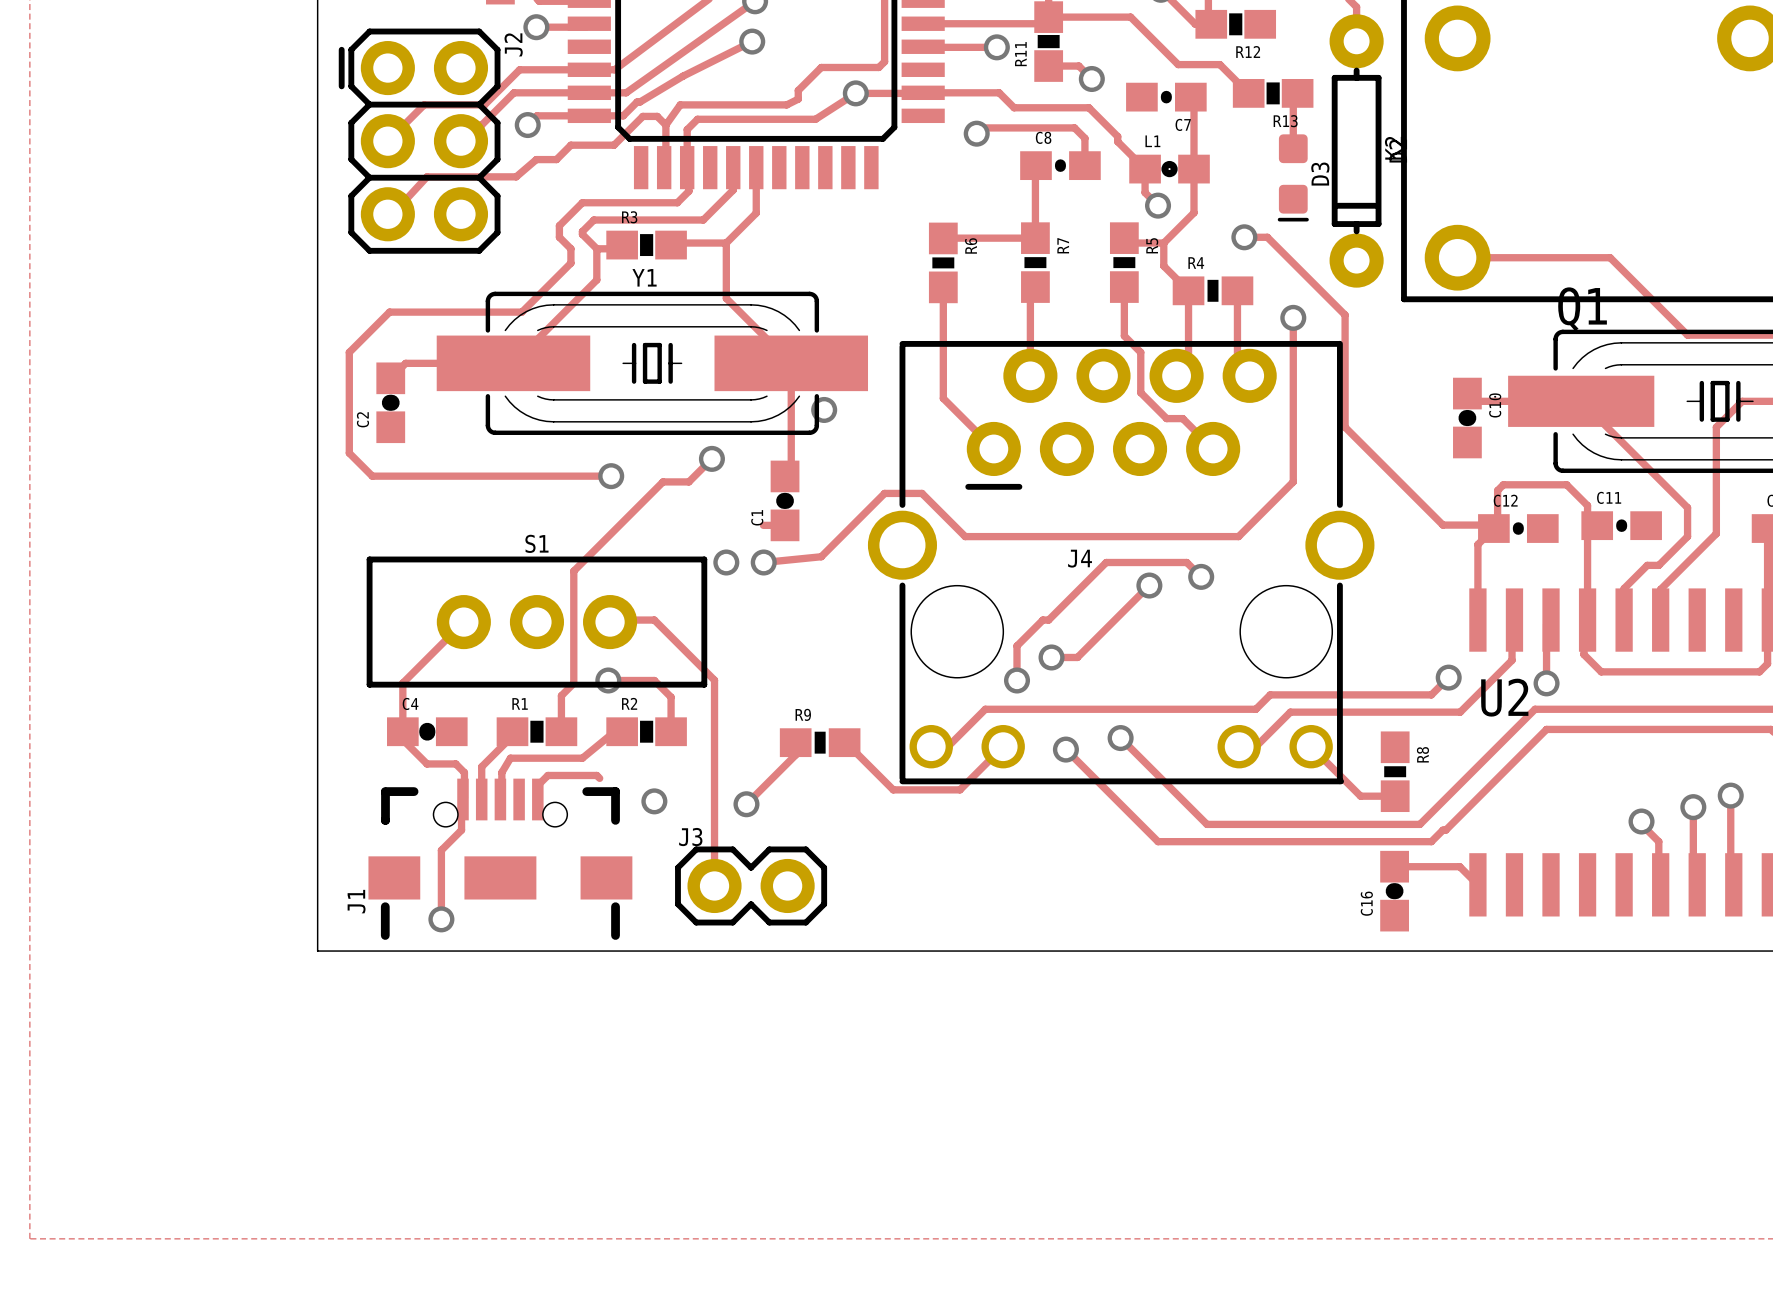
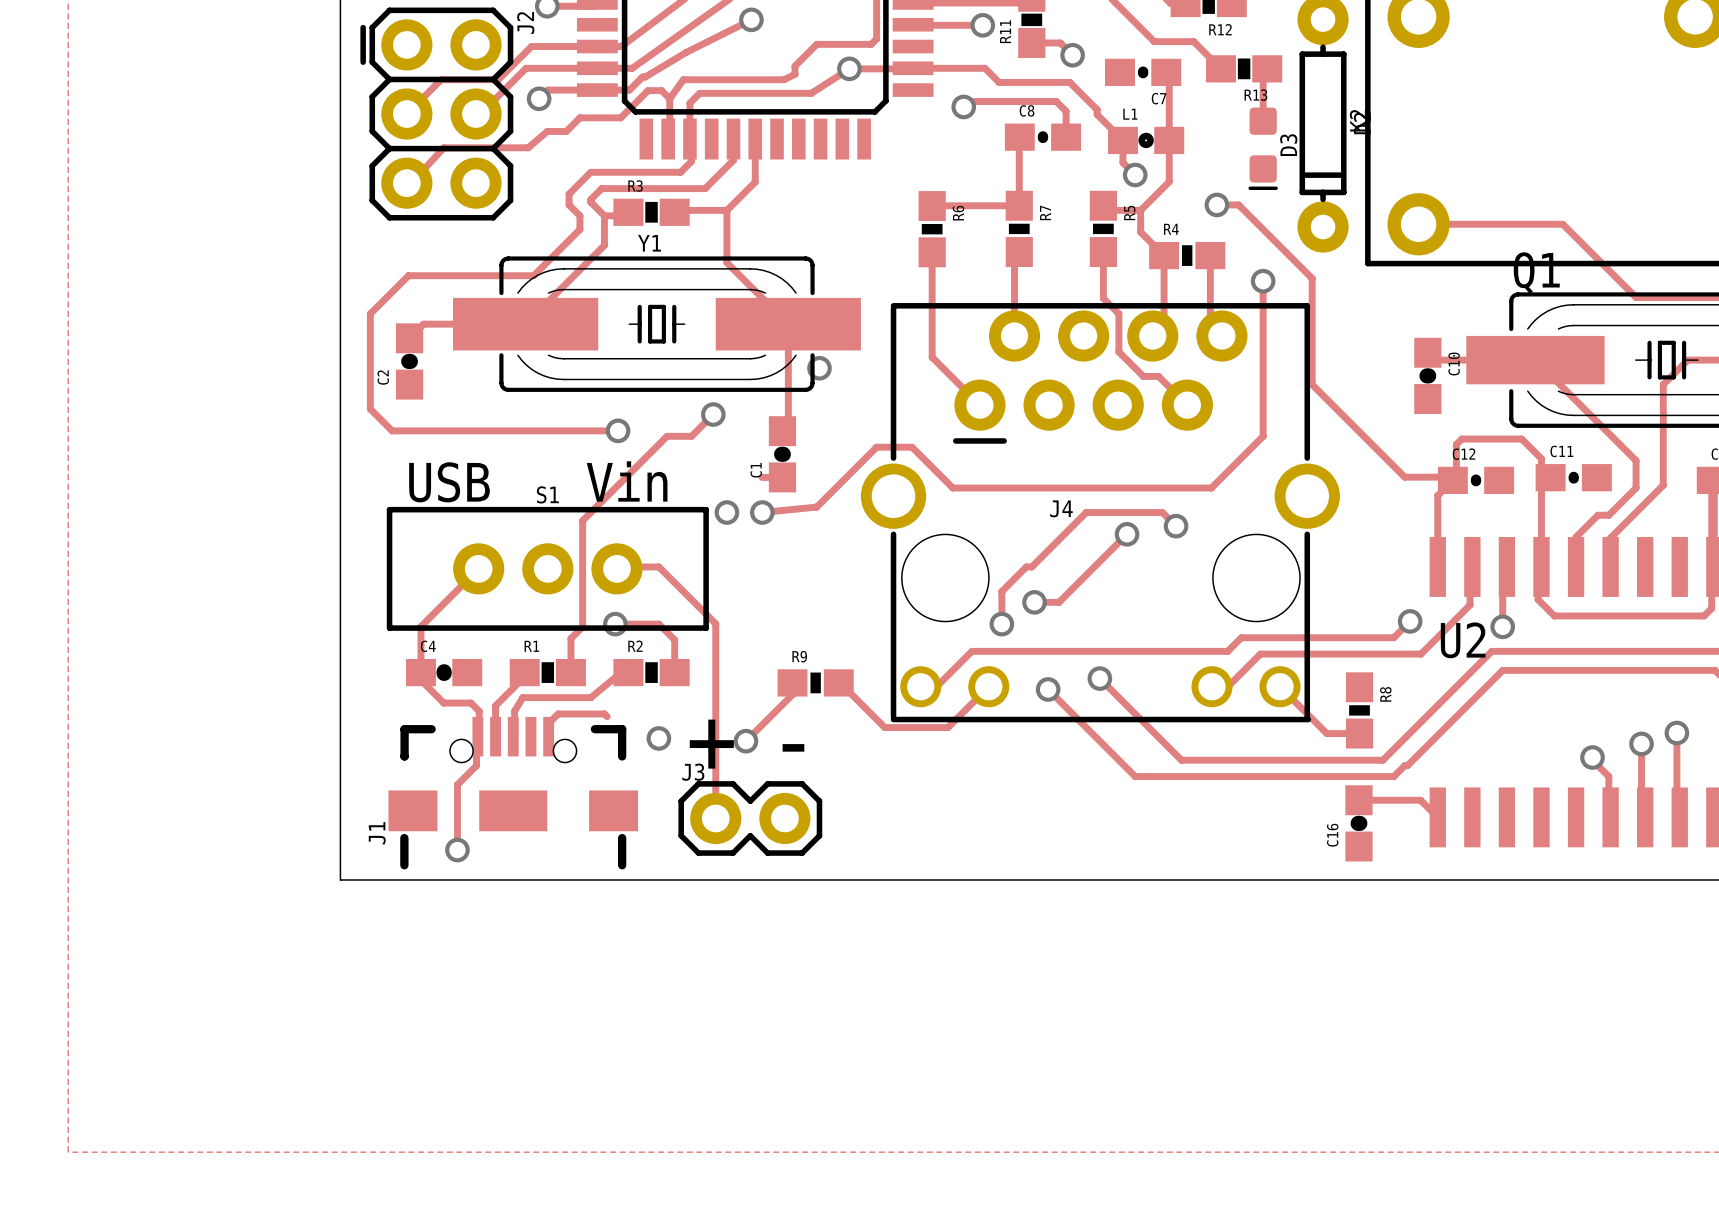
text: none -> Vin (627, 481)
text: none -> USB (449, 482)
text: none -> + (711, 744)
text: none -> - (793, 747)

